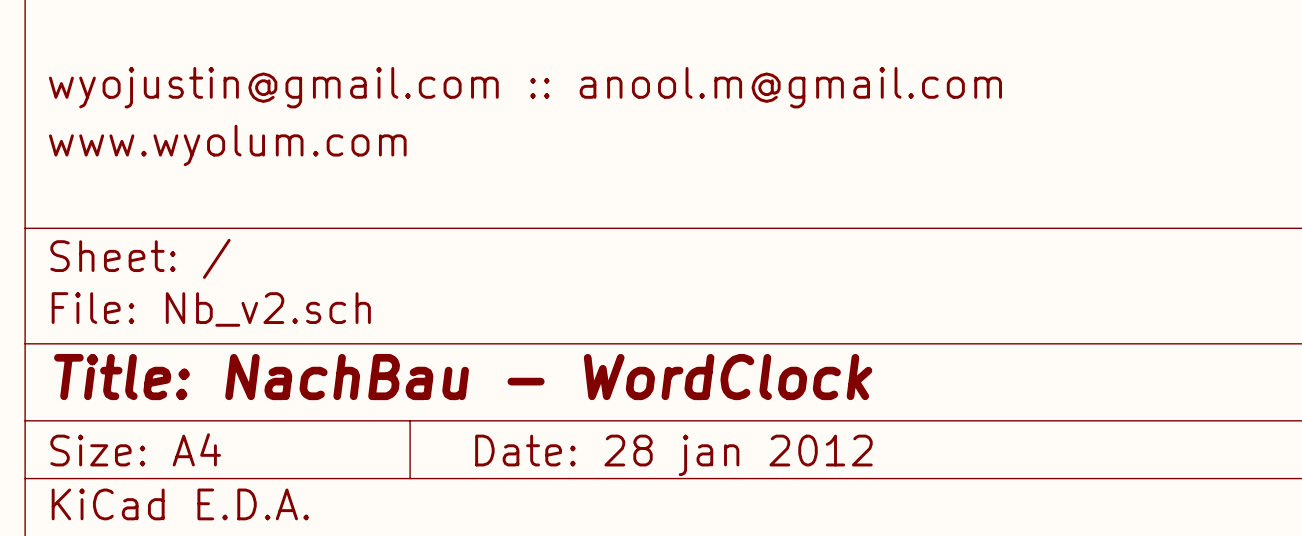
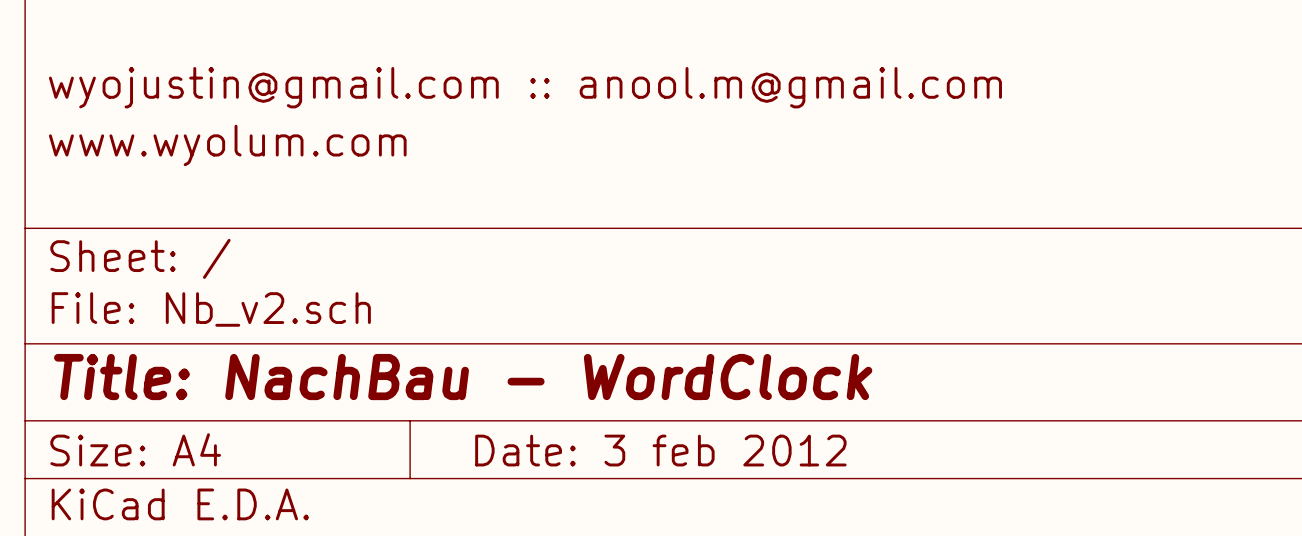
title block: Date: 28 jan 2012 (673, 455) -> Date: 3 feb 2012 (660, 450)

